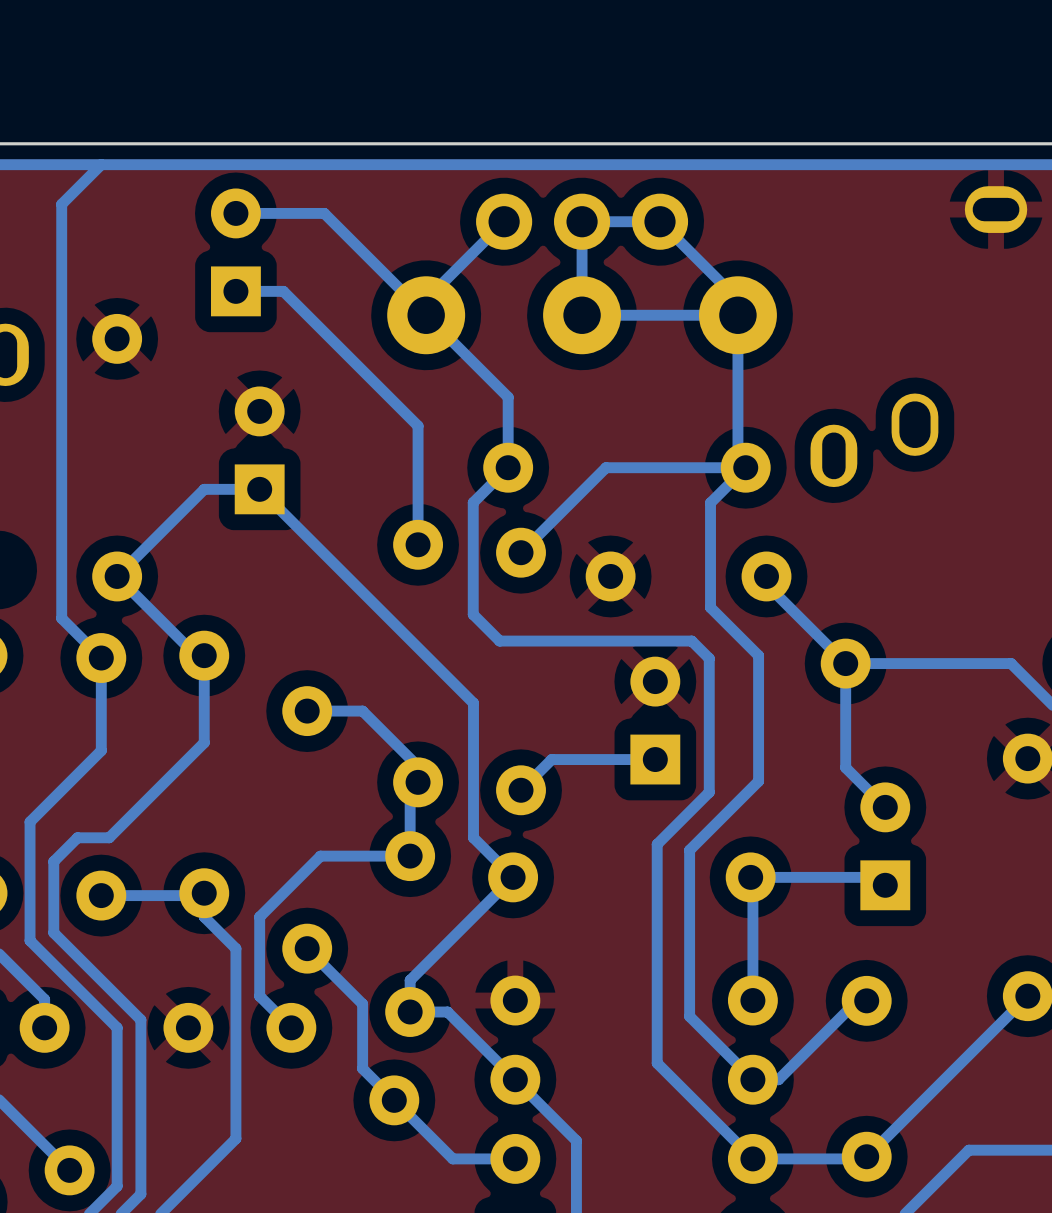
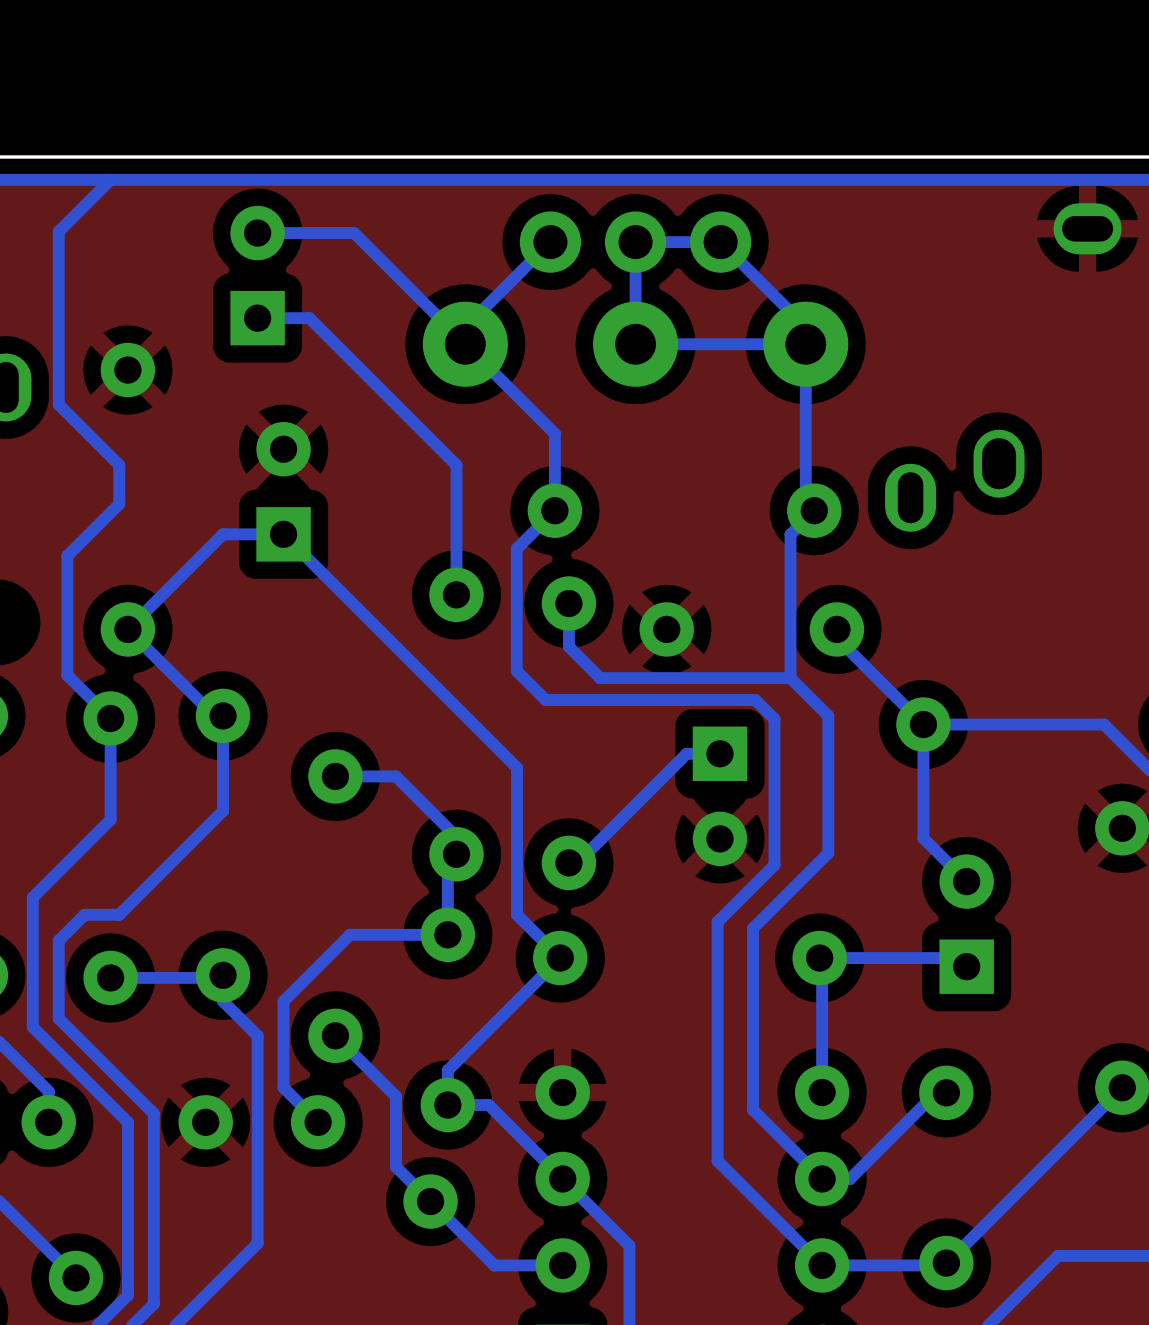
bottom track: (61, 204) (61, 509) -> (67, 223) (58, 231) (58, 404) (119, 465) (119, 504) (67, 555)
bottom track: (745, 467) (606, 467) (521, 552) -> (790, 534) (790, 678) (600, 678) (568, 646) (568, 603)
bottom track: (723, 489) (710, 502) (710, 607) (723, 621) -> none
part rotation: 0° (655, 720) -> 180° (719, 796)
bottom track: (655, 759) (551, 759) (521, 790) -> (719, 753) (686, 753) (577, 862) (568, 862)

